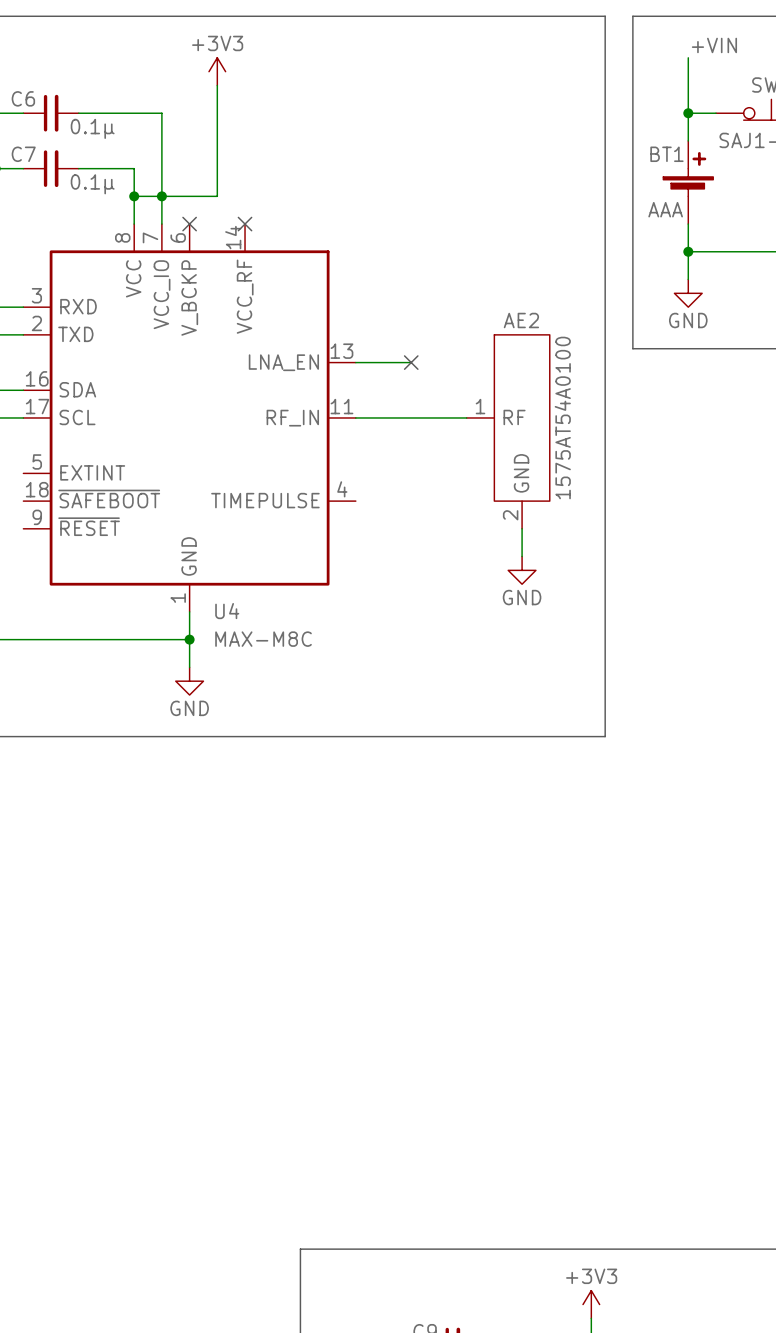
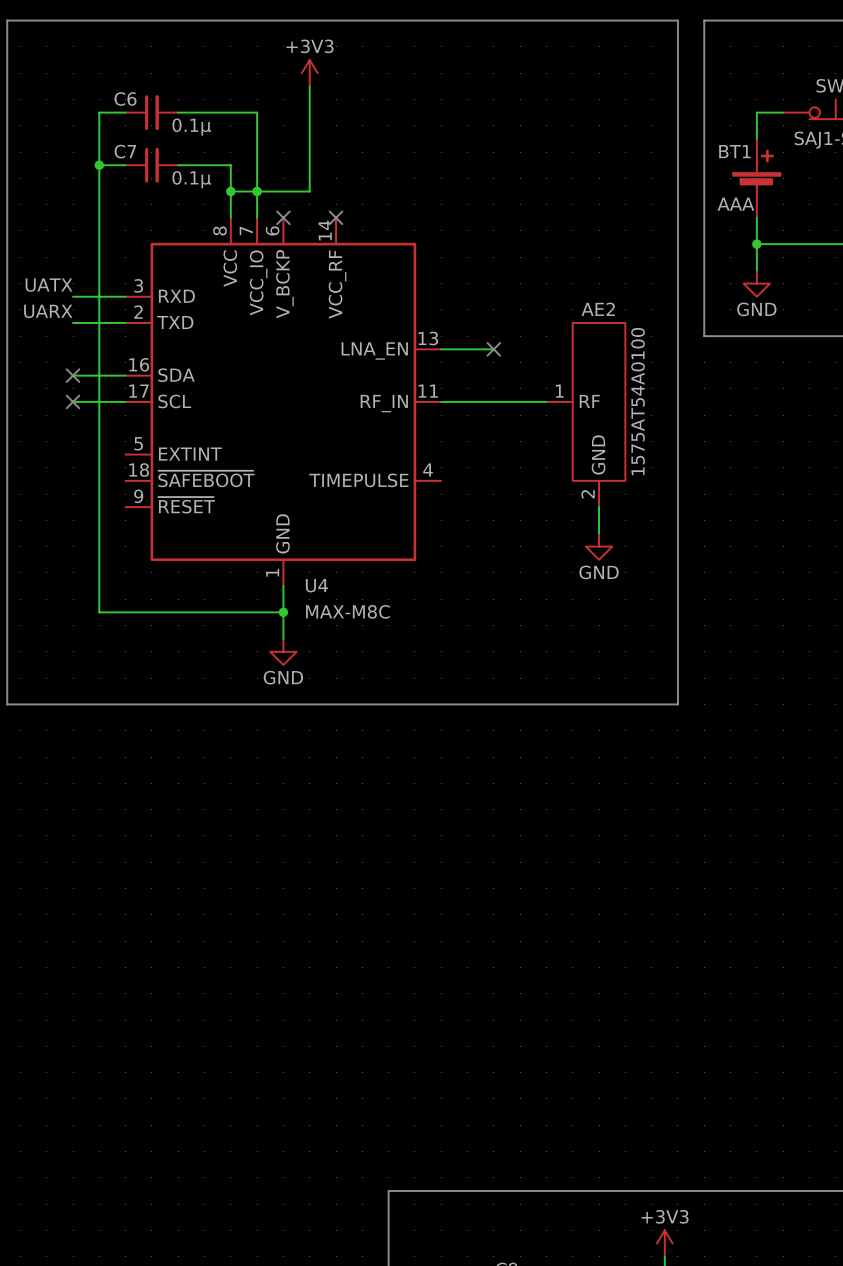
label: +VIN (714, 45) -> none
wire: (688, 57) (688, 113) -> none
junction: (688, 113) -> none

